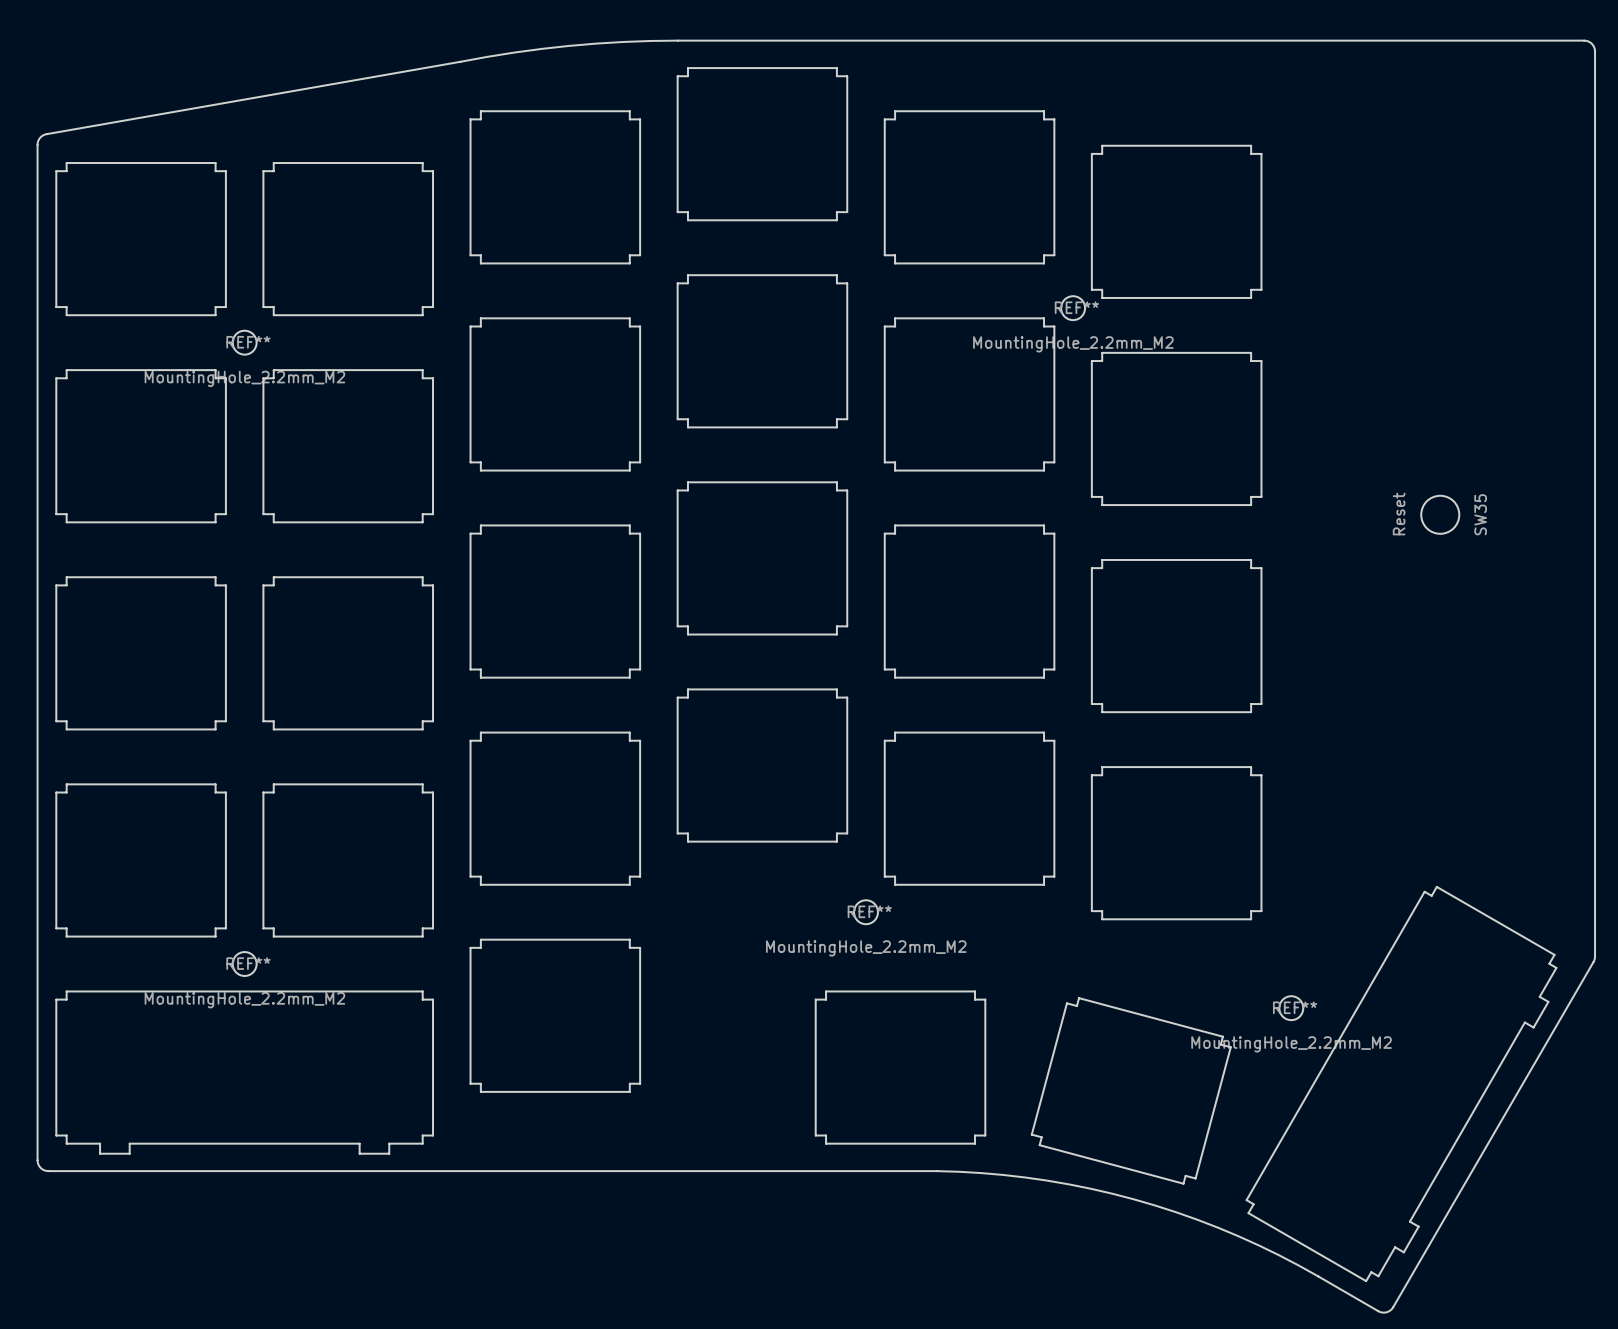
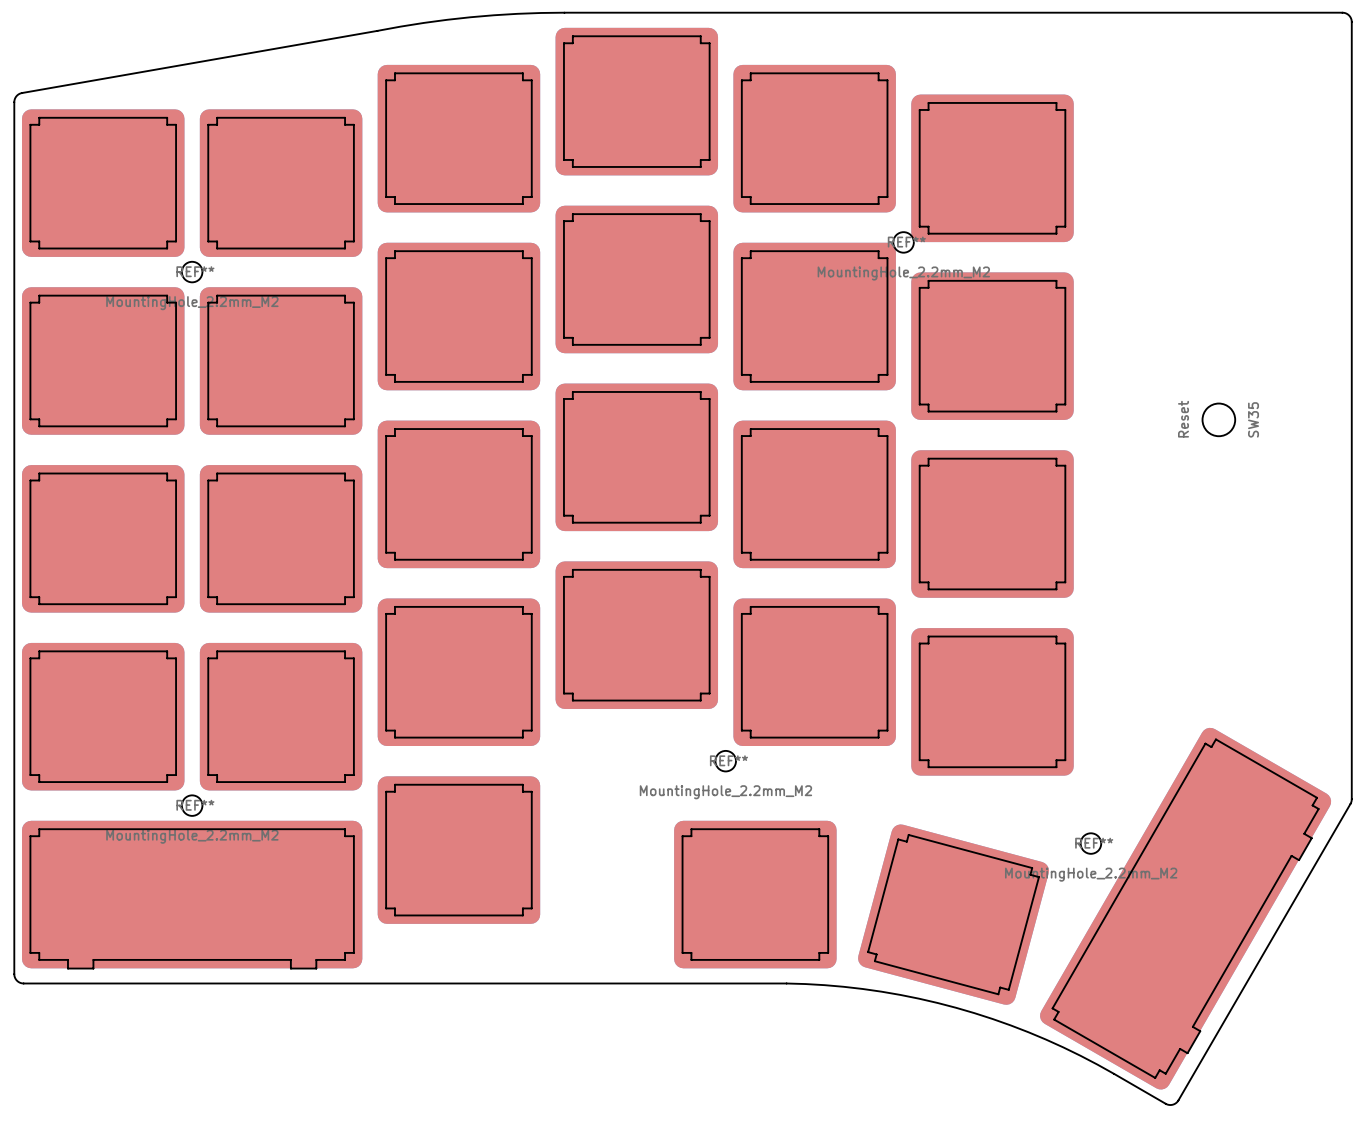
drawing: [676, 67, 848, 221] -> none
drawing: [469, 110, 641, 265] -> none
drawing: [884, 110, 1056, 265] -> none
part: none -> (636, 101)
drawing: [1091, 145, 1263, 299] -> none
drawing: [55, 162, 227, 316] -> none
drawing: [262, 162, 434, 316] -> none
part: none -> (458, 138)
part: none -> (814, 138)
part: none -> (992, 168)
part: none -> (103, 183)
part: none -> (281, 183)
drawing: [676, 274, 848, 429] -> none
drawing: [469, 317, 641, 472] -> none
drawing: [884, 317, 1056, 472] -> none
part: none -> (636, 279)
drawing: [1091, 352, 1263, 506] -> none
drawing: [55, 369, 227, 523] -> none
drawing: [262, 369, 434, 523] -> none
part: none -> (458, 316)
part: none -> (814, 316)
part: none -> (992, 346)
part: none -> (103, 360)
part: none -> (281, 360)
drawing: [676, 481, 848, 636] -> none
drawing: [469, 524, 641, 679] -> none
drawing: [884, 524, 1056, 679] -> none
part: none -> (636, 457)
drawing: [1091, 559, 1263, 713] -> none
drawing: [55, 576, 227, 731] -> none
drawing: [262, 576, 434, 731] -> none
part: none -> (458, 494)
part: none -> (814, 494)
part: none -> (992, 524)
part: none -> (103, 538)
part: none -> (281, 538)
drawing: [676, 688, 848, 843] -> none
drawing: [469, 731, 641, 886] -> none
drawing: [884, 731, 1056, 886] -> none
part: none -> (636, 635)
drawing: [1091, 766, 1558, 1282] -> none
drawing: [55, 783, 227, 938] -> none
drawing: [262, 783, 434, 938] -> none
part: none -> (458, 672)
part: none -> (814, 672)
part: none -> (992, 701)
part: none -> (103, 716)
part: none -> (281, 716)
drawing: [469, 939, 641, 1093] -> none
drawing: [55, 990, 434, 1155] -> none
drawing: [815, 990, 986, 1145] -> none
drawing: [1031, 997, 1232, 1185] -> none
part: none -> (458, 850)
part: none -> (755, 894)
part: none -> (192, 894)
part: none -> (1185, 908)
part: none -> (953, 914)

